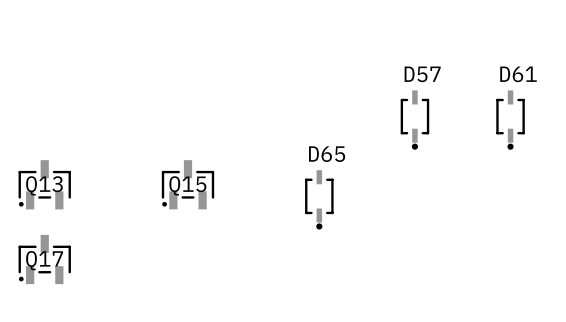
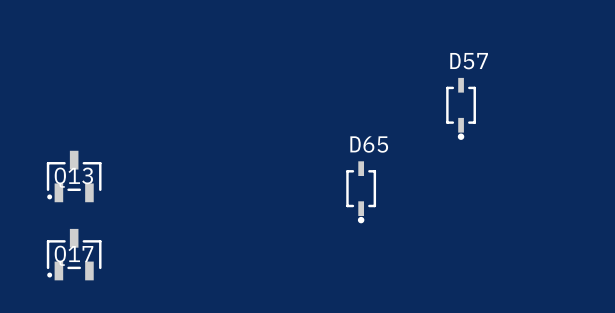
D61: (510, 120) -> none
Q15: (188, 184) -> none

